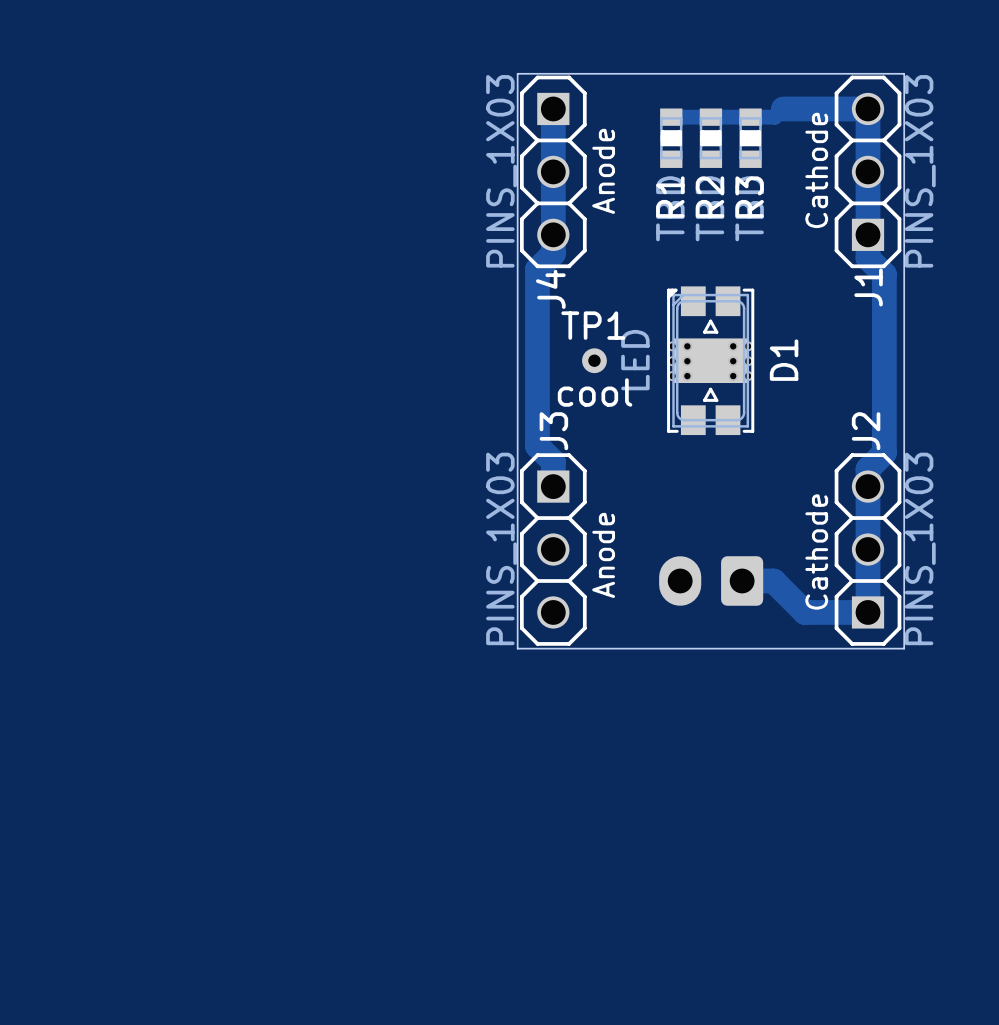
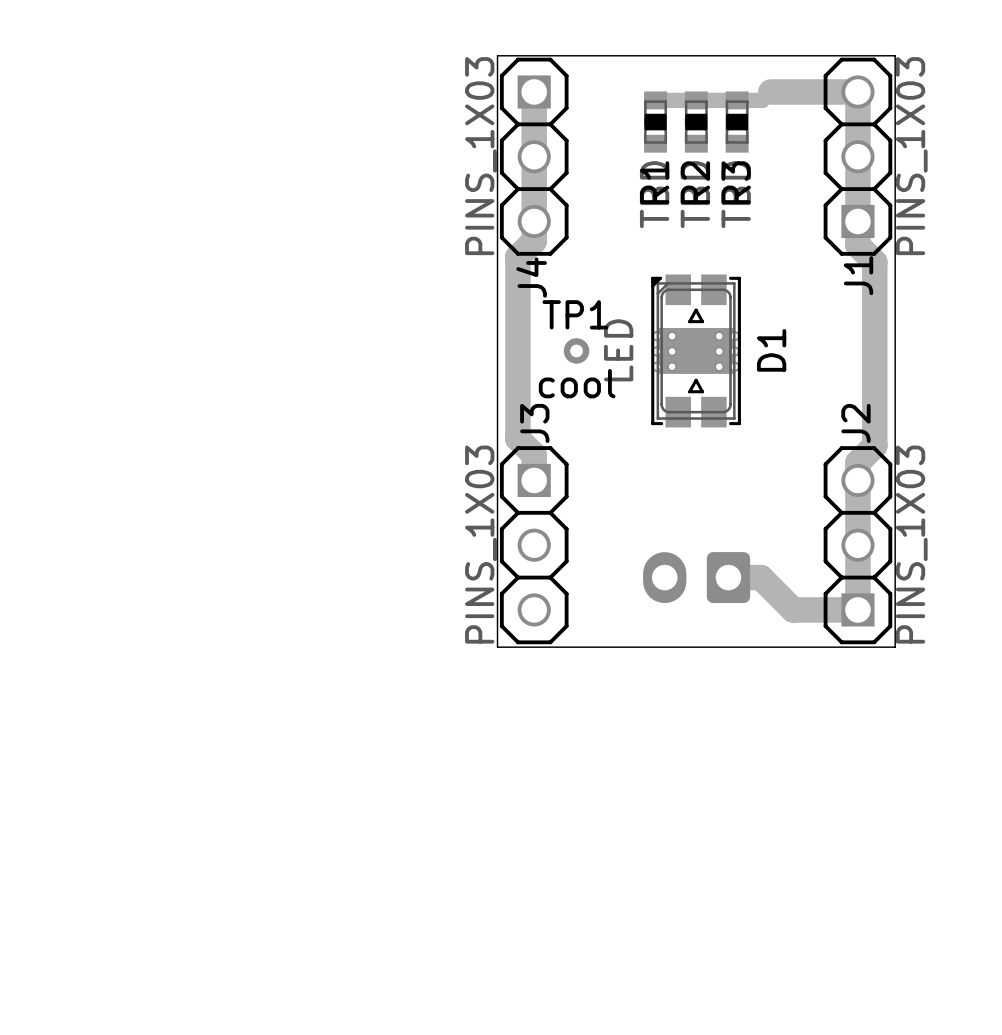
text: Cathode (816, 170) -> none
text: Anode (603, 171) -> none
text: Cathode (816, 552) -> none
text: Anode (603, 555) -> none

